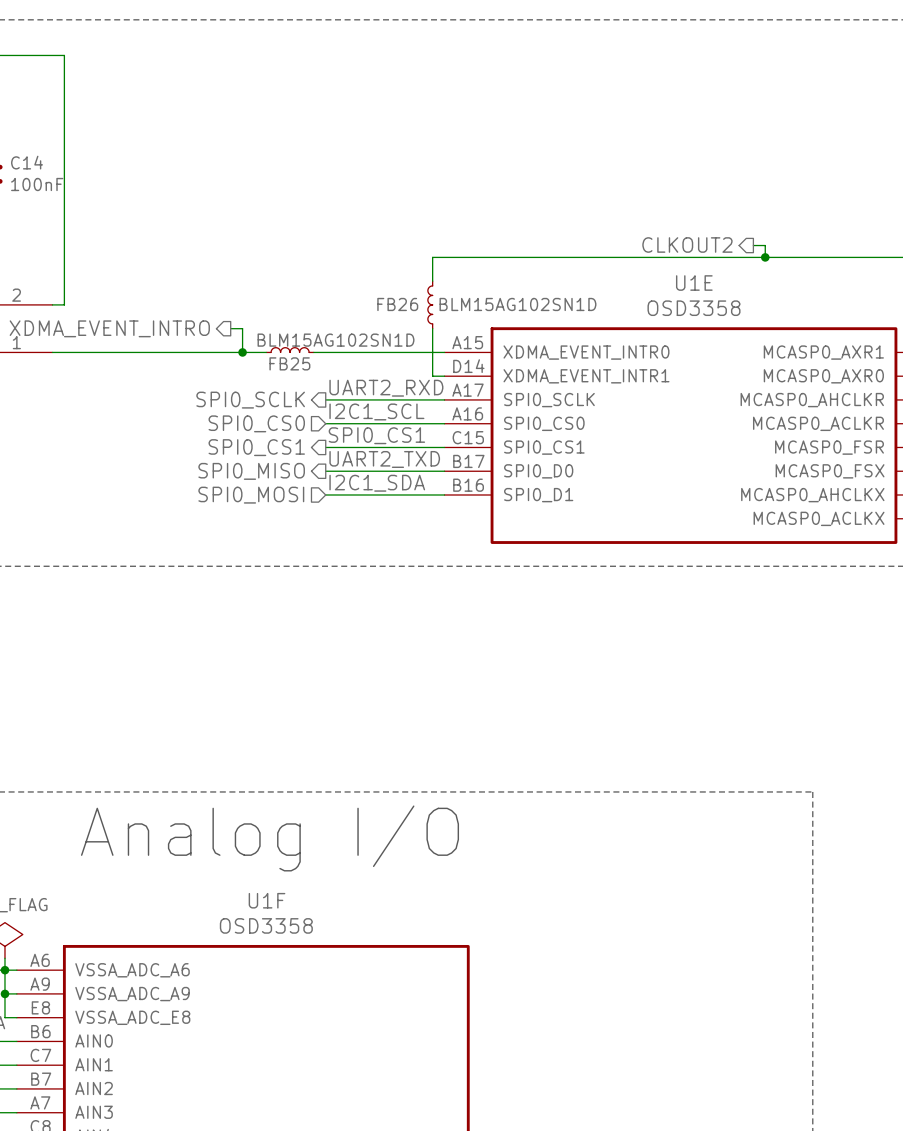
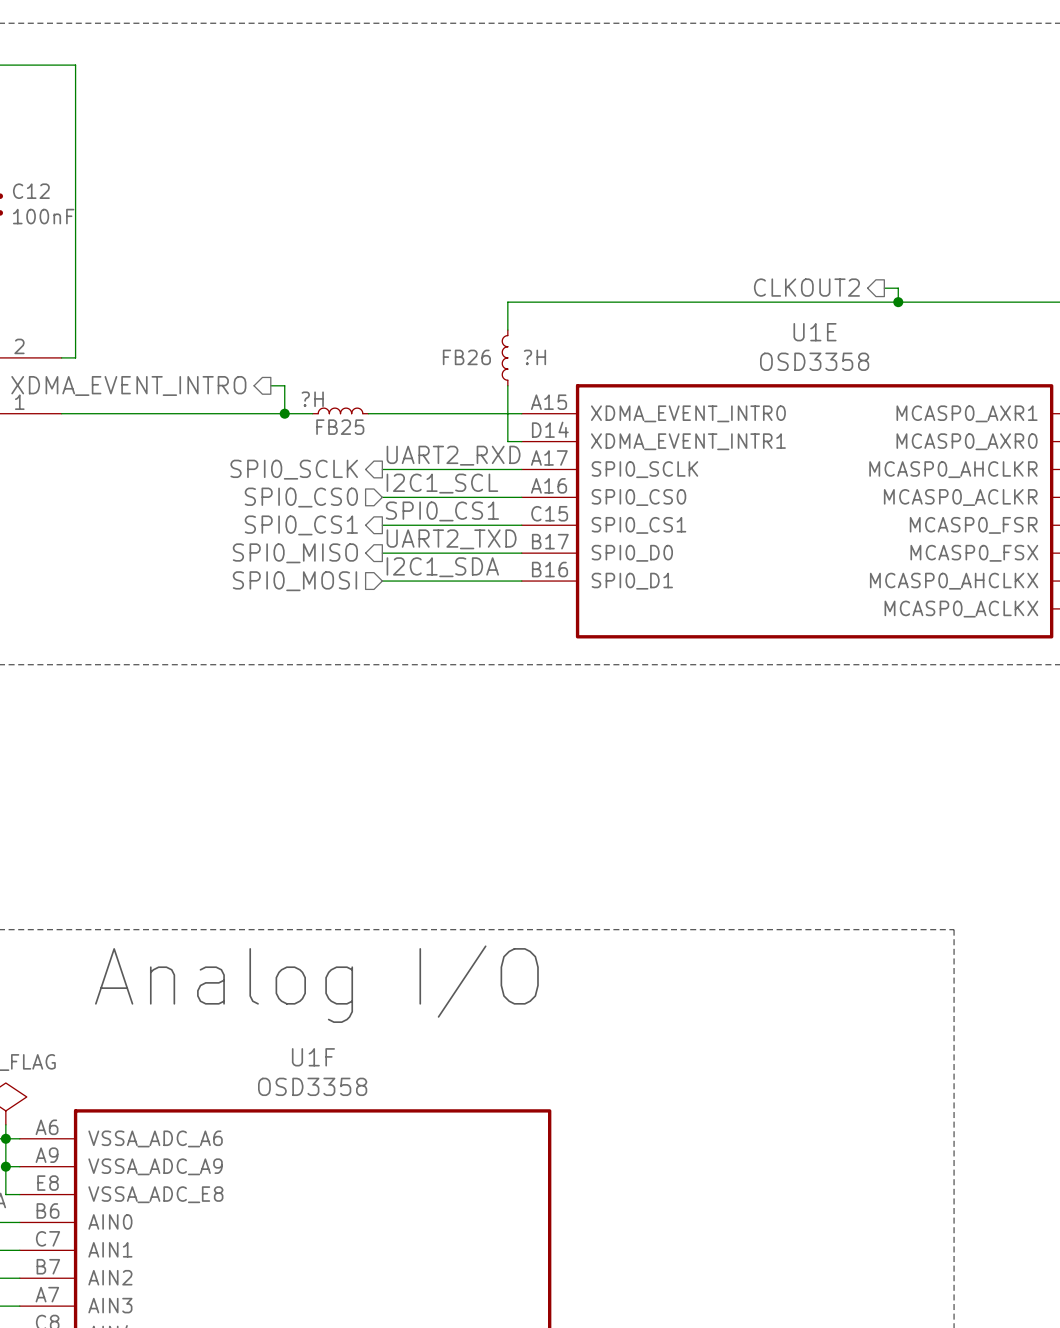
C14 name: C14 (27, 162) -> C12 (31, 191)
FB26 value: BLM15AG102SN1D (517, 304) -> ?H (534, 357)
FB25 value: BLM15AG102SN1D (336, 340) -> ?H (312, 399)

